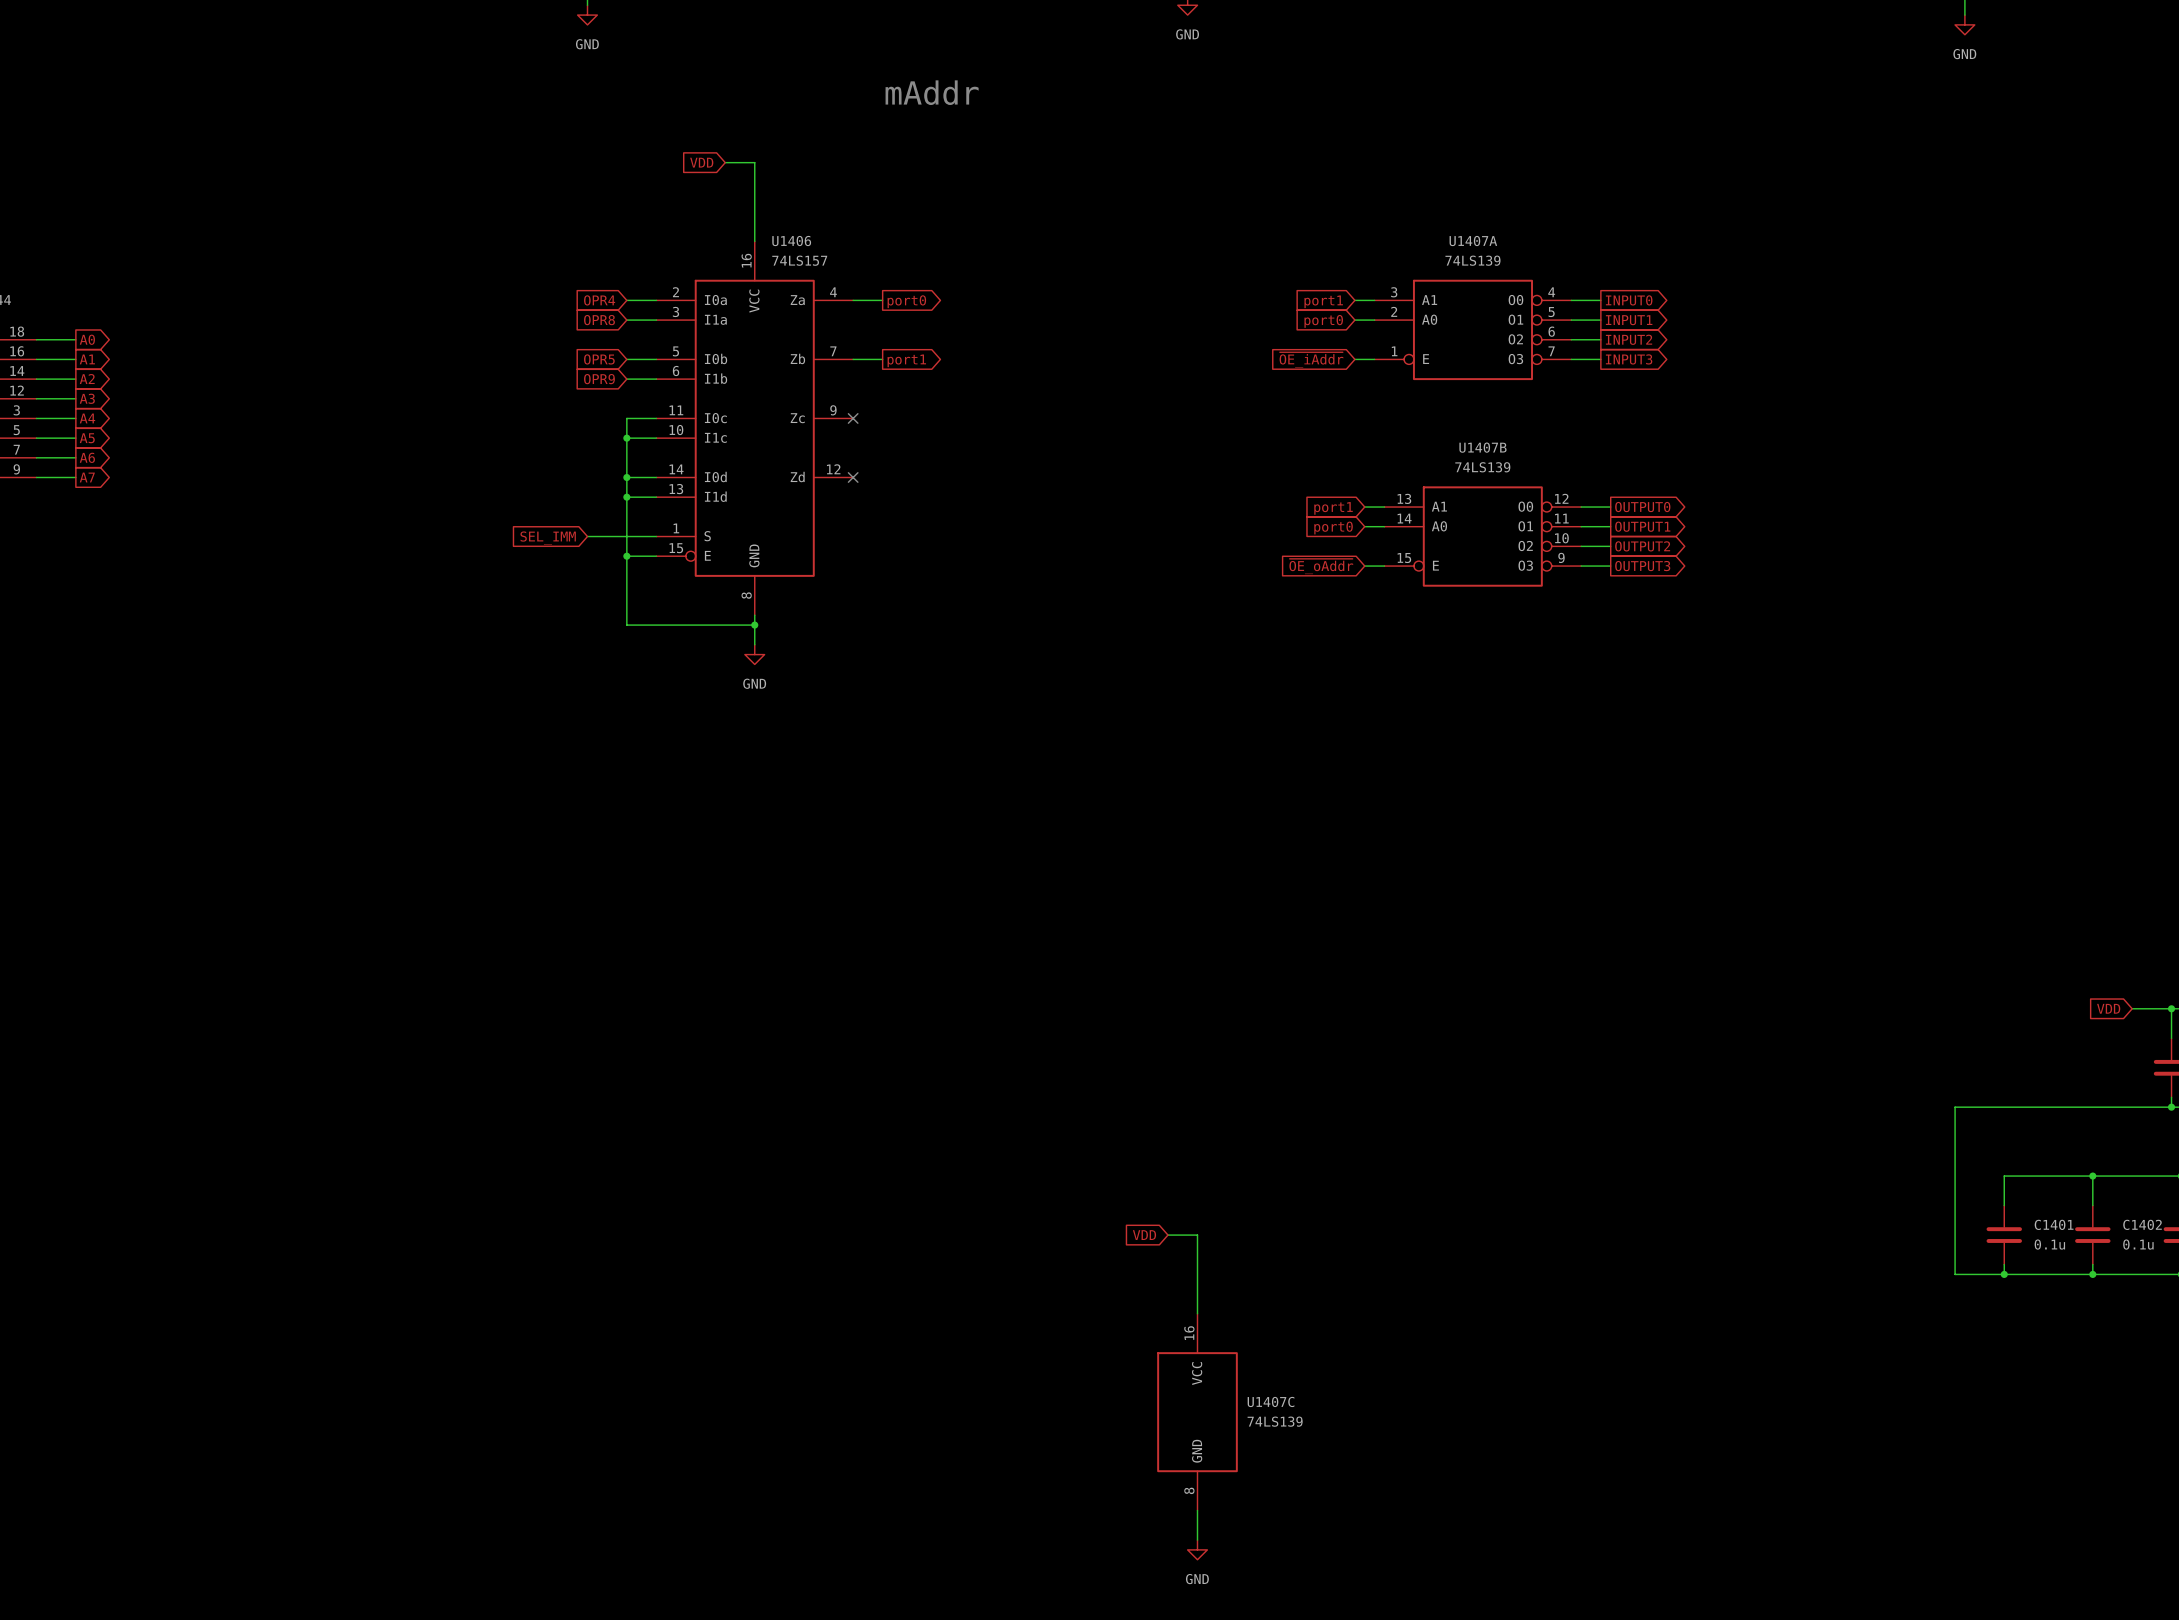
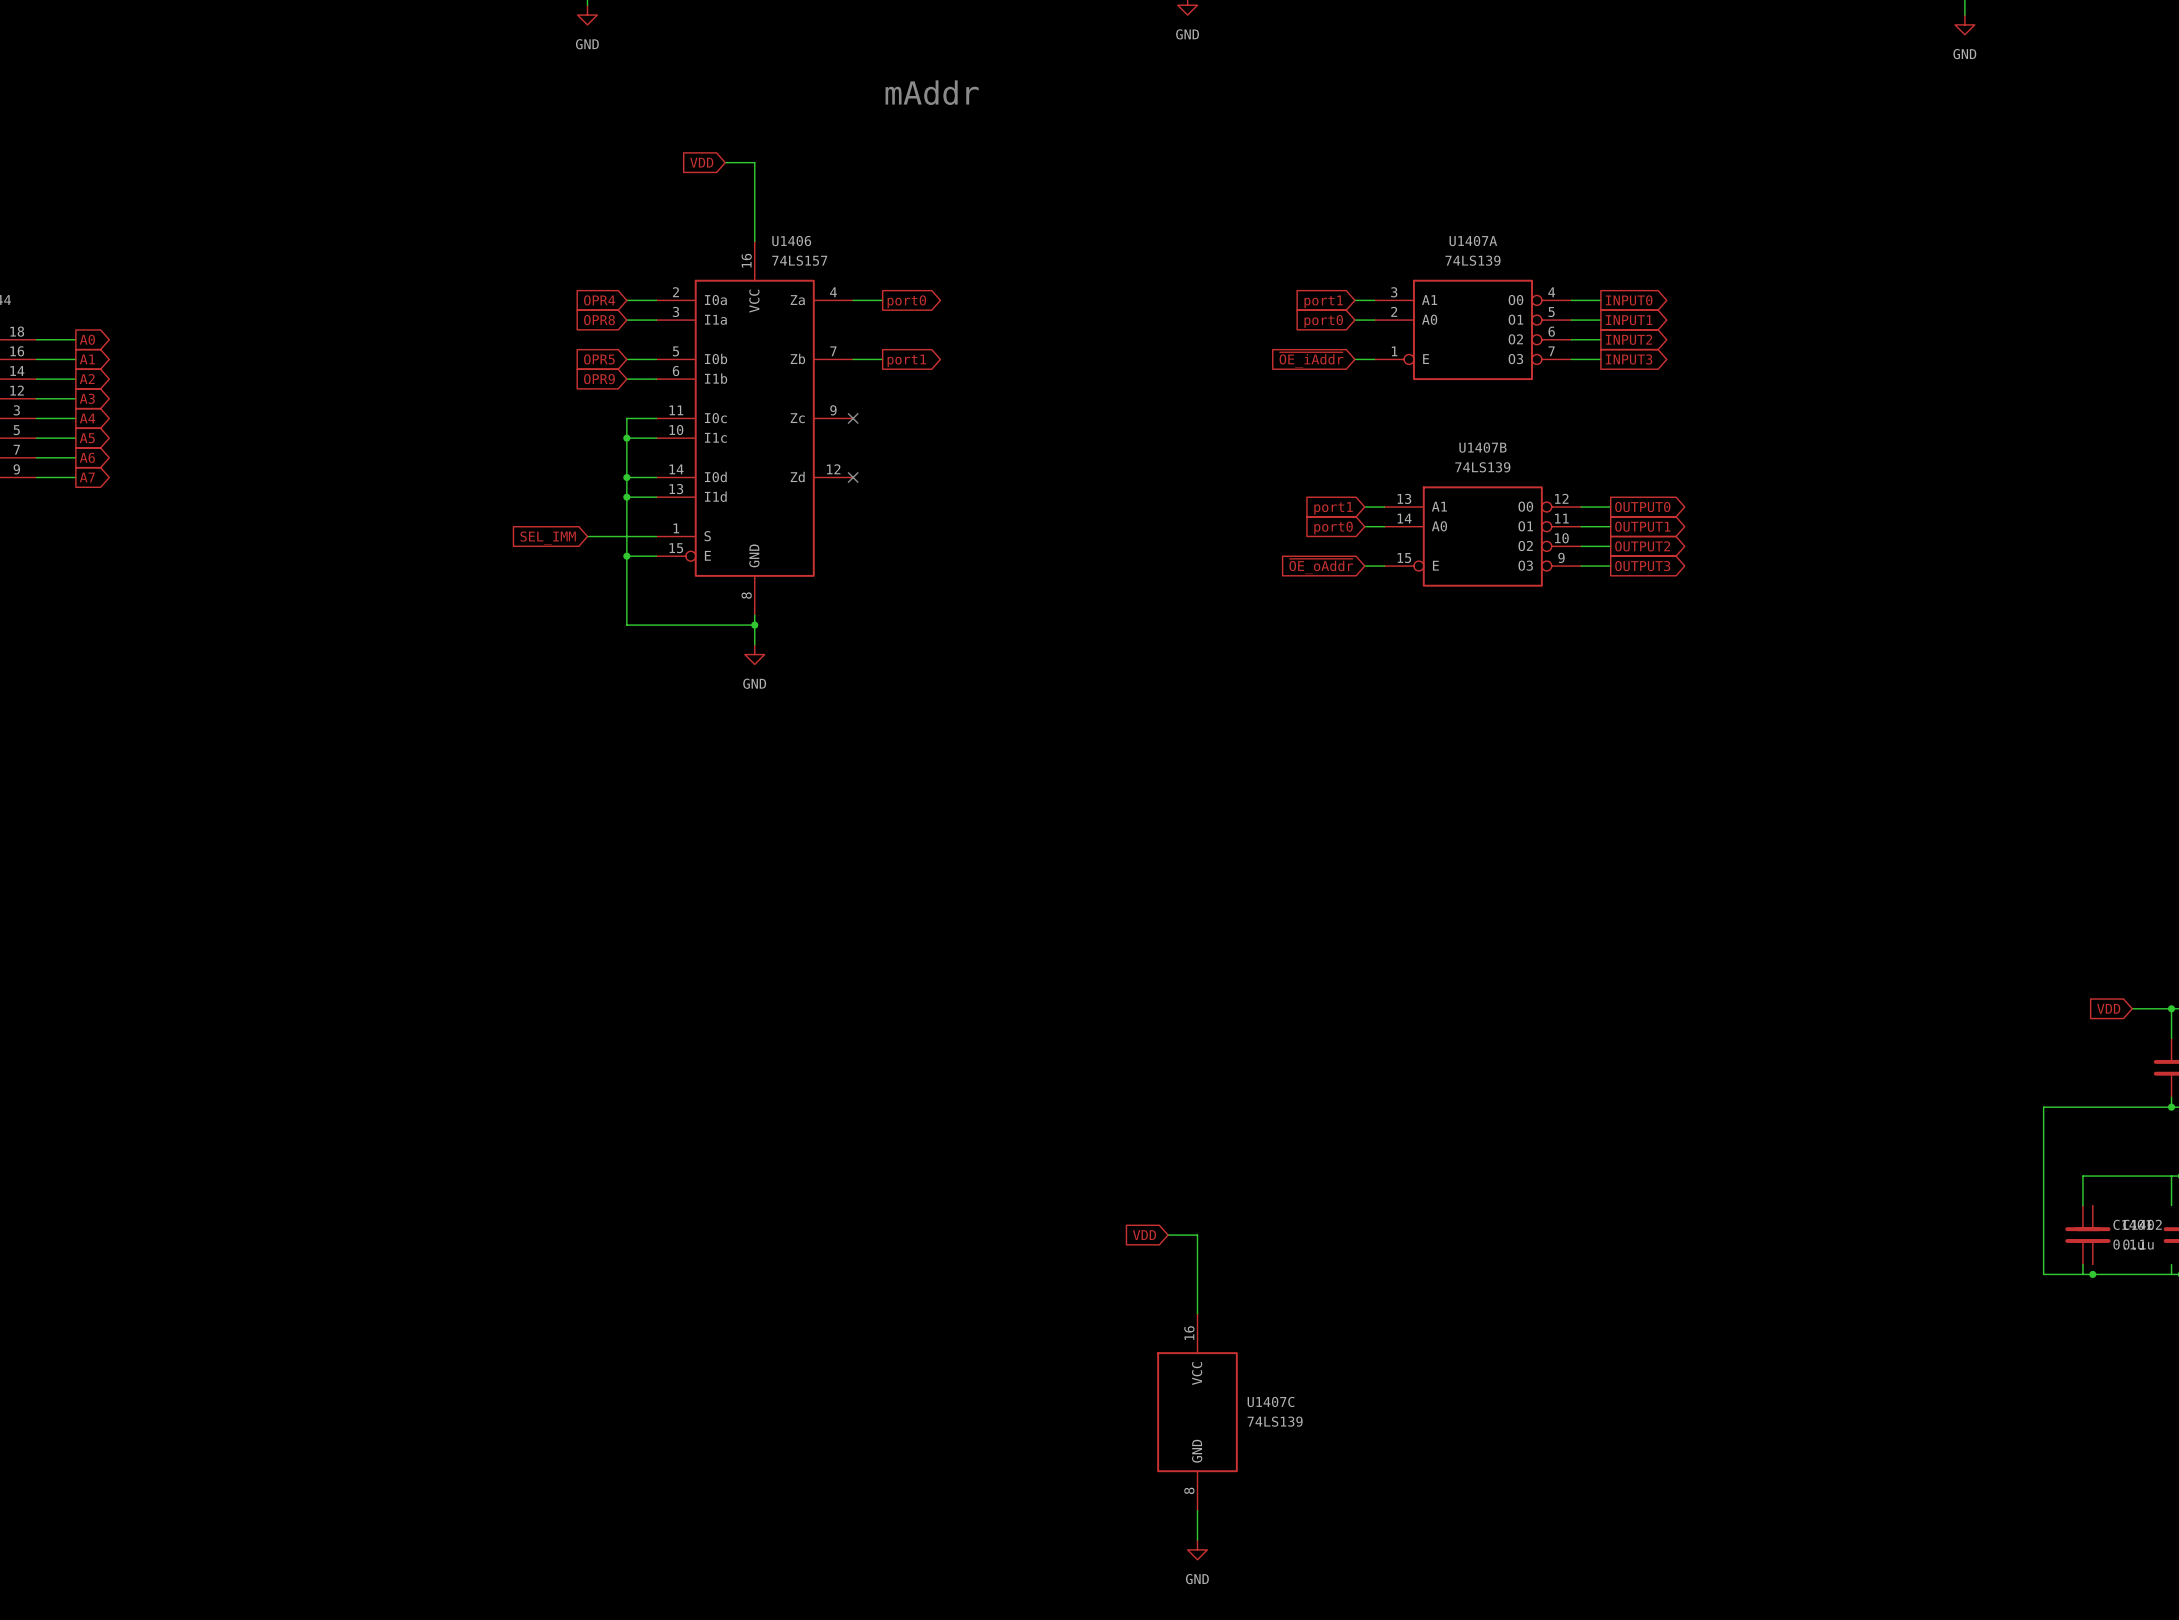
wire: (2043, 1107) (1955, 1107) (1955, 1274) (2043, 1274) -> (2043, 1107) (2043, 1274)
wire: (2082, 1176) (2004, 1176) (2004, 1205) -> (2082, 1176) (2082, 1205)
wire: (2092, 1176) (2092, 1205) -> (2171, 1176) (2171, 1205)
junction: (2092, 1176) -> none
C1401 position: (2004, 1235) -> (2082, 1235)
wire: (2004, 1264) (2004, 1274) -> (2082, 1264) (2082, 1274)
wire: (2092, 1264) (2092, 1274) -> (2171, 1264) (2171, 1274)
junction: (2004, 1274) -> none

